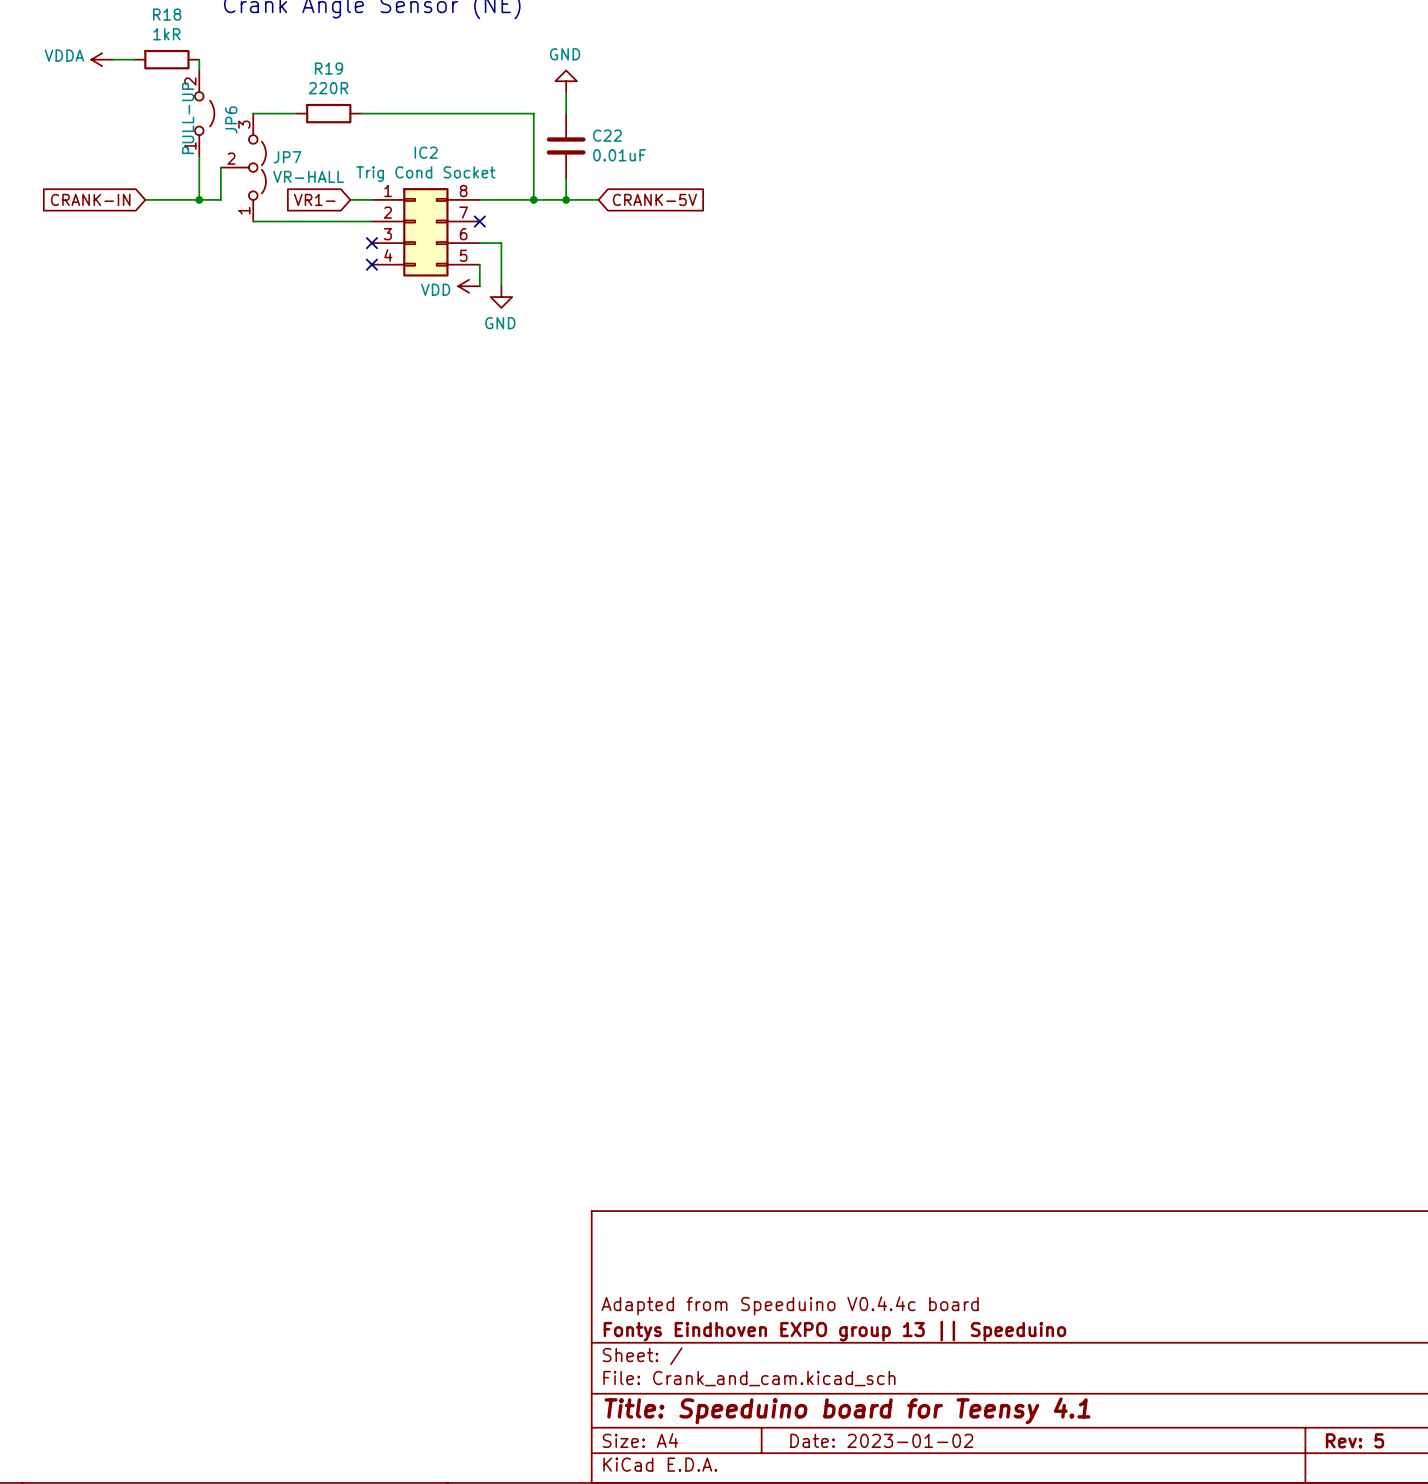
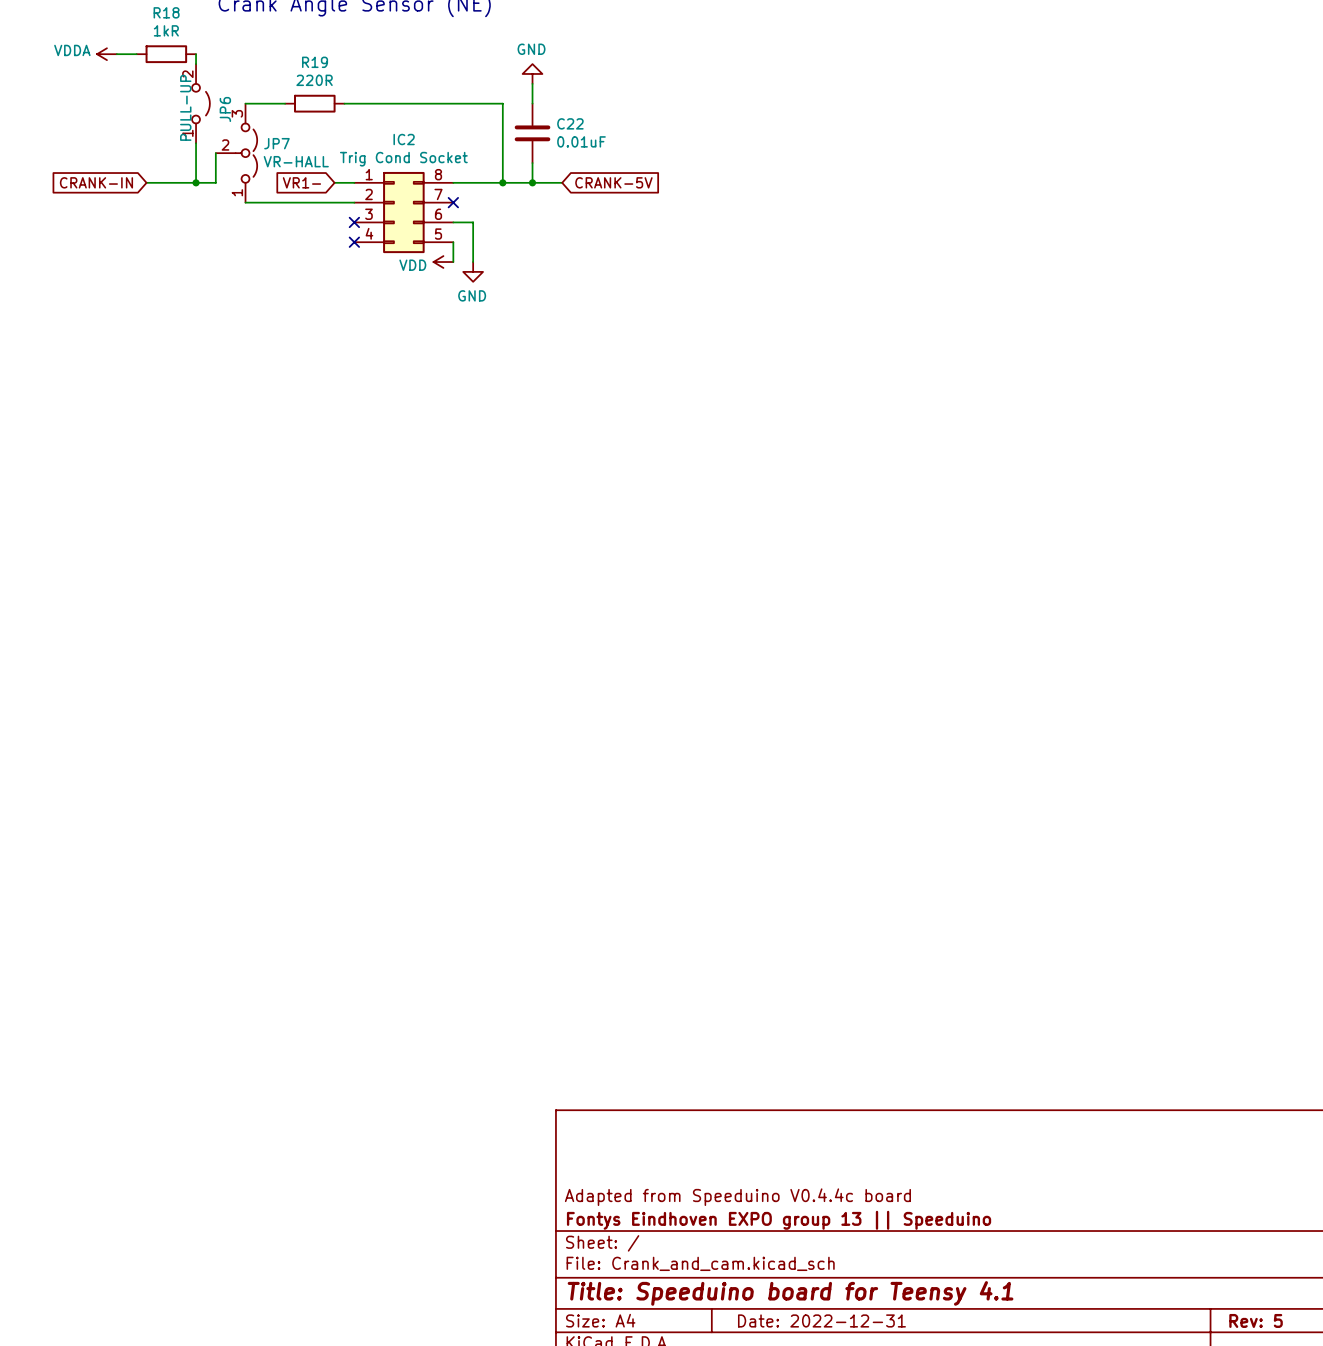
title block: Date: 2023-01-02 (881, 1440) -> Date: 2022-12-31 (821, 1320)

